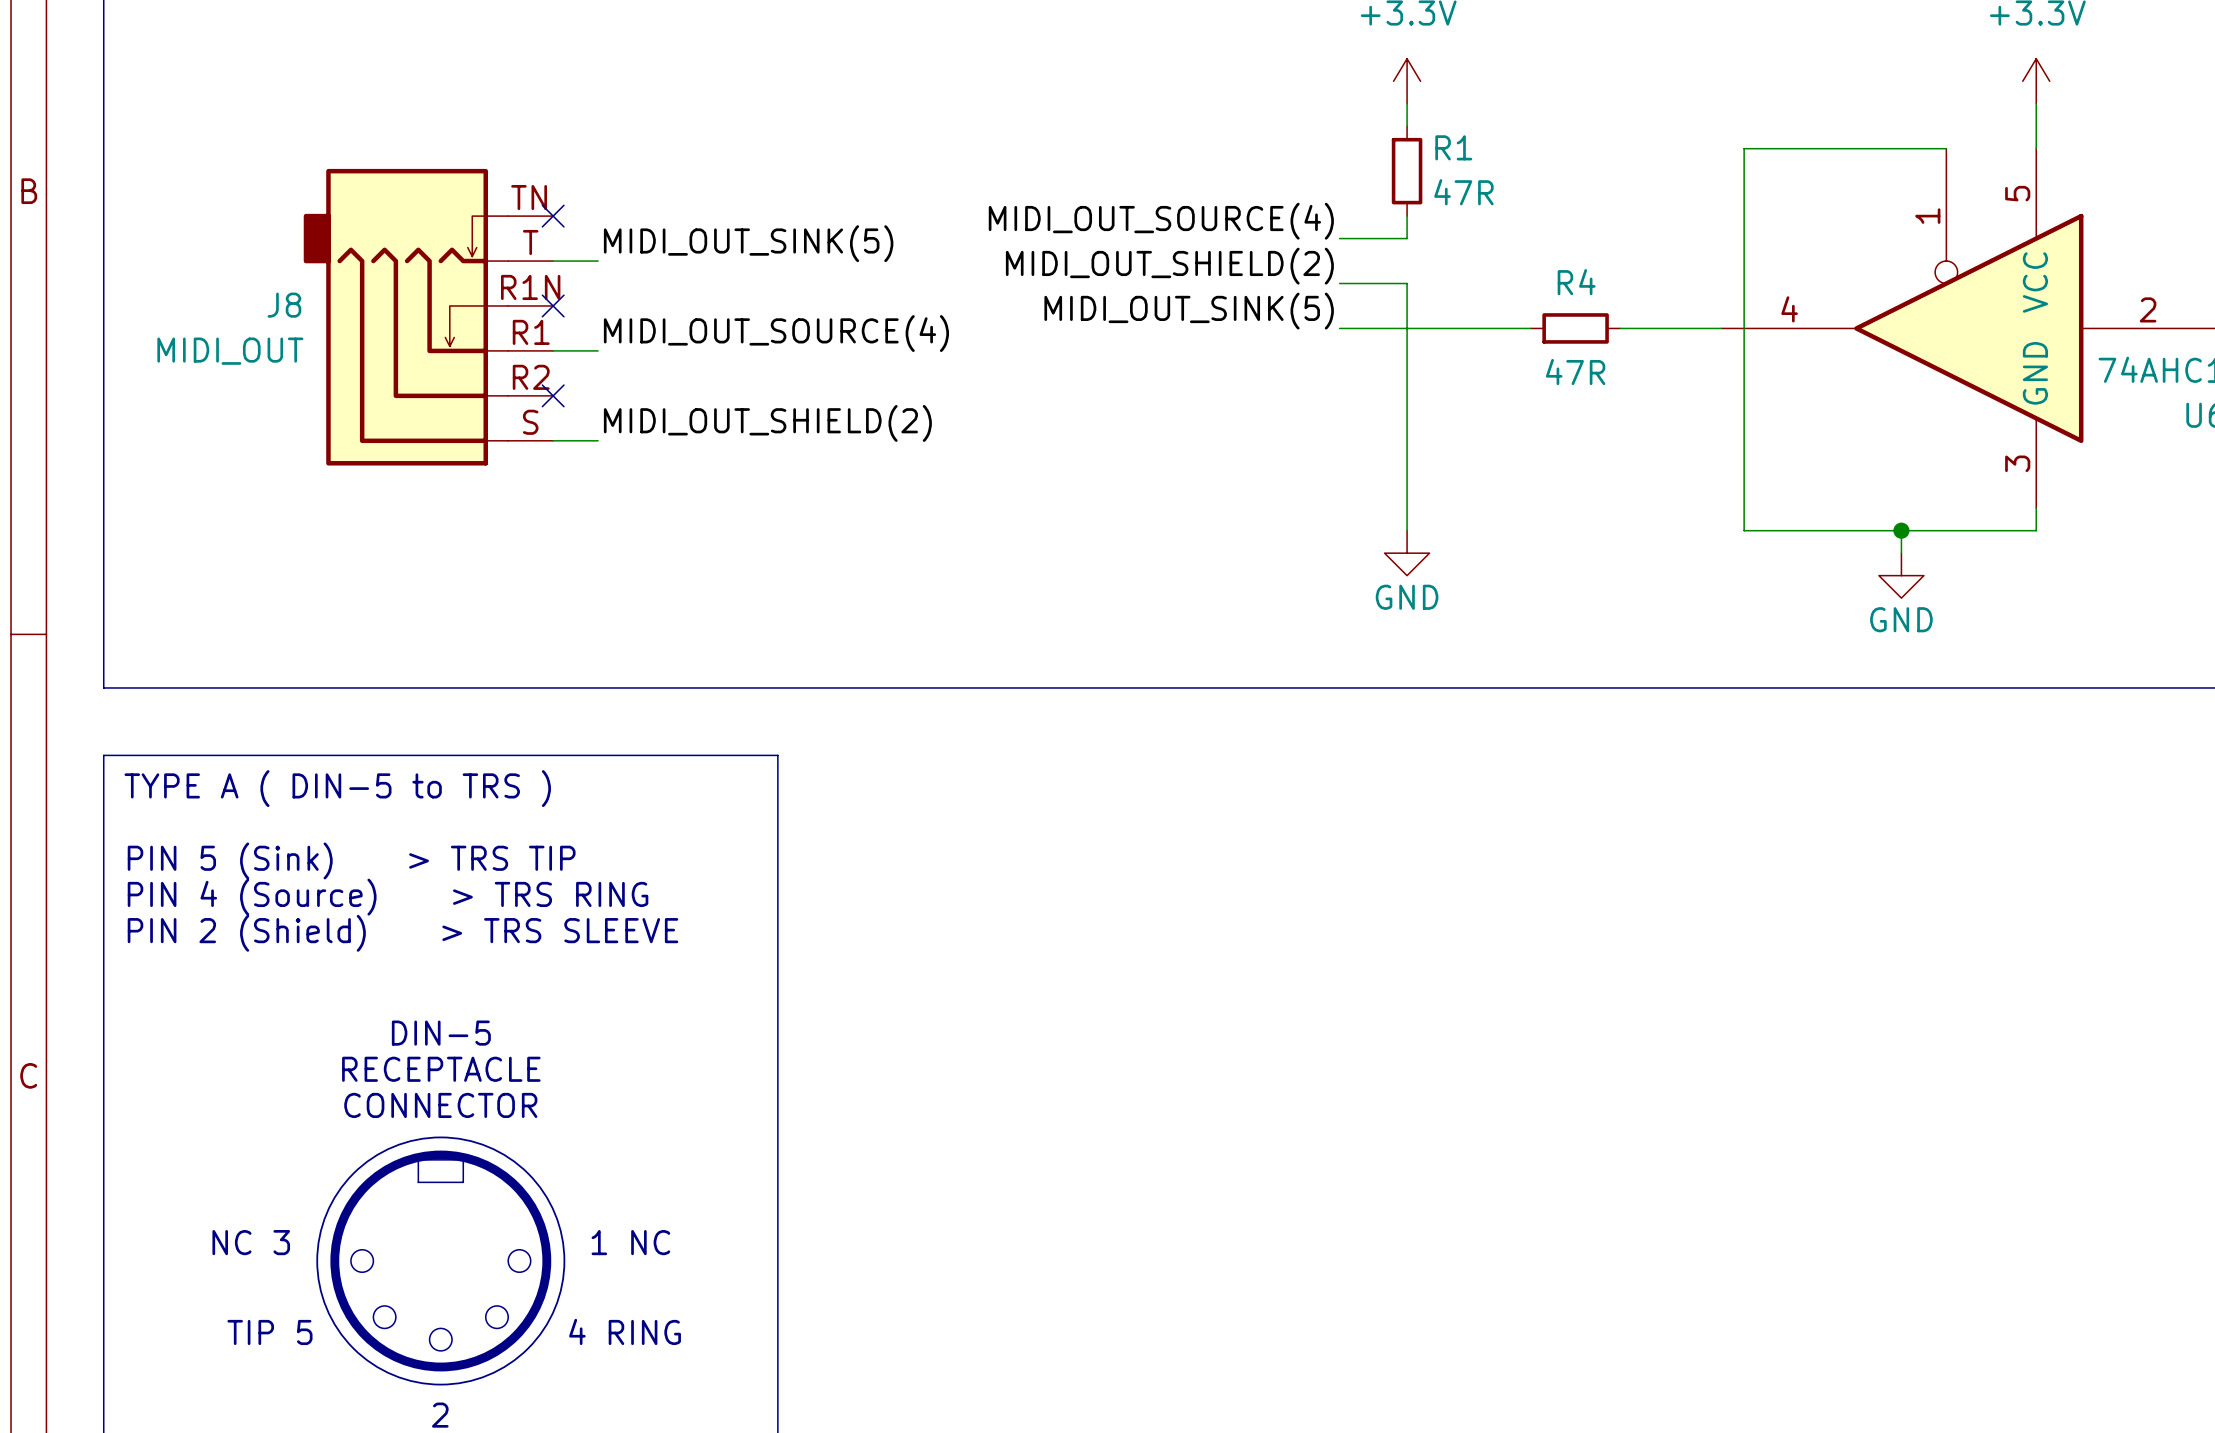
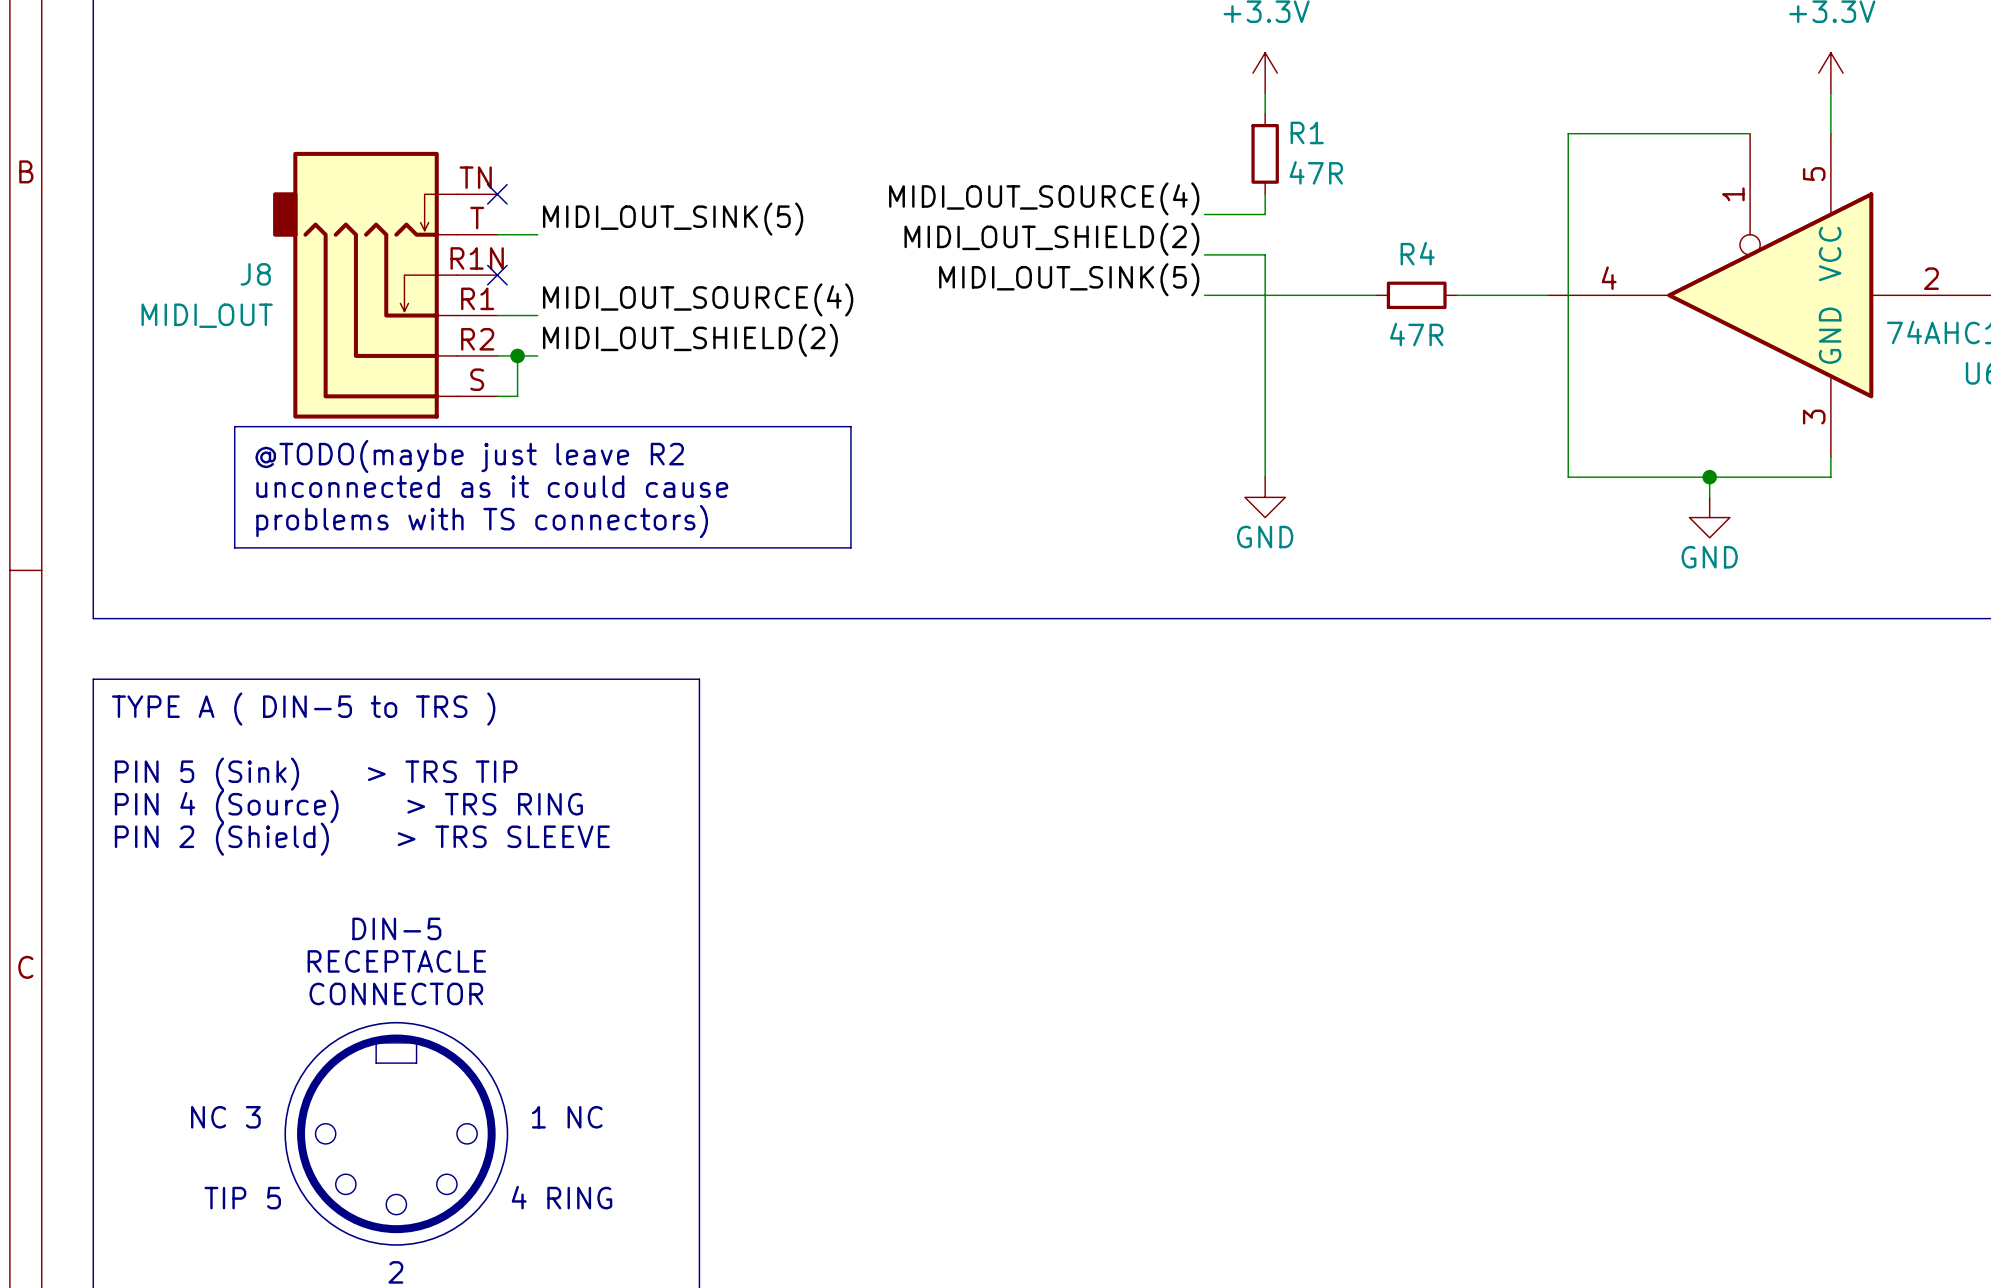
wire: none -> (497, 355) (537, 355)
no-connect mark: (553, 395) -> none
junction: none -> (517, 355)
label position: MIDI_OUT_SHIELD(2) (767, 423) -> MIDI_OUT_SHIELD(2) (690, 340)
wire: (575, 440) (598, 440) -> (517, 396) (517, 355)
line: none -> (234, 426) (850, 426) (850, 547) (234, 547) (234, 426)
text: none -> @TODO(maybe just leave R2 (469, 456)
text: none -> unconnected as it could cause (492, 486)
text: none -> problems with TS connectors) (482, 521)

